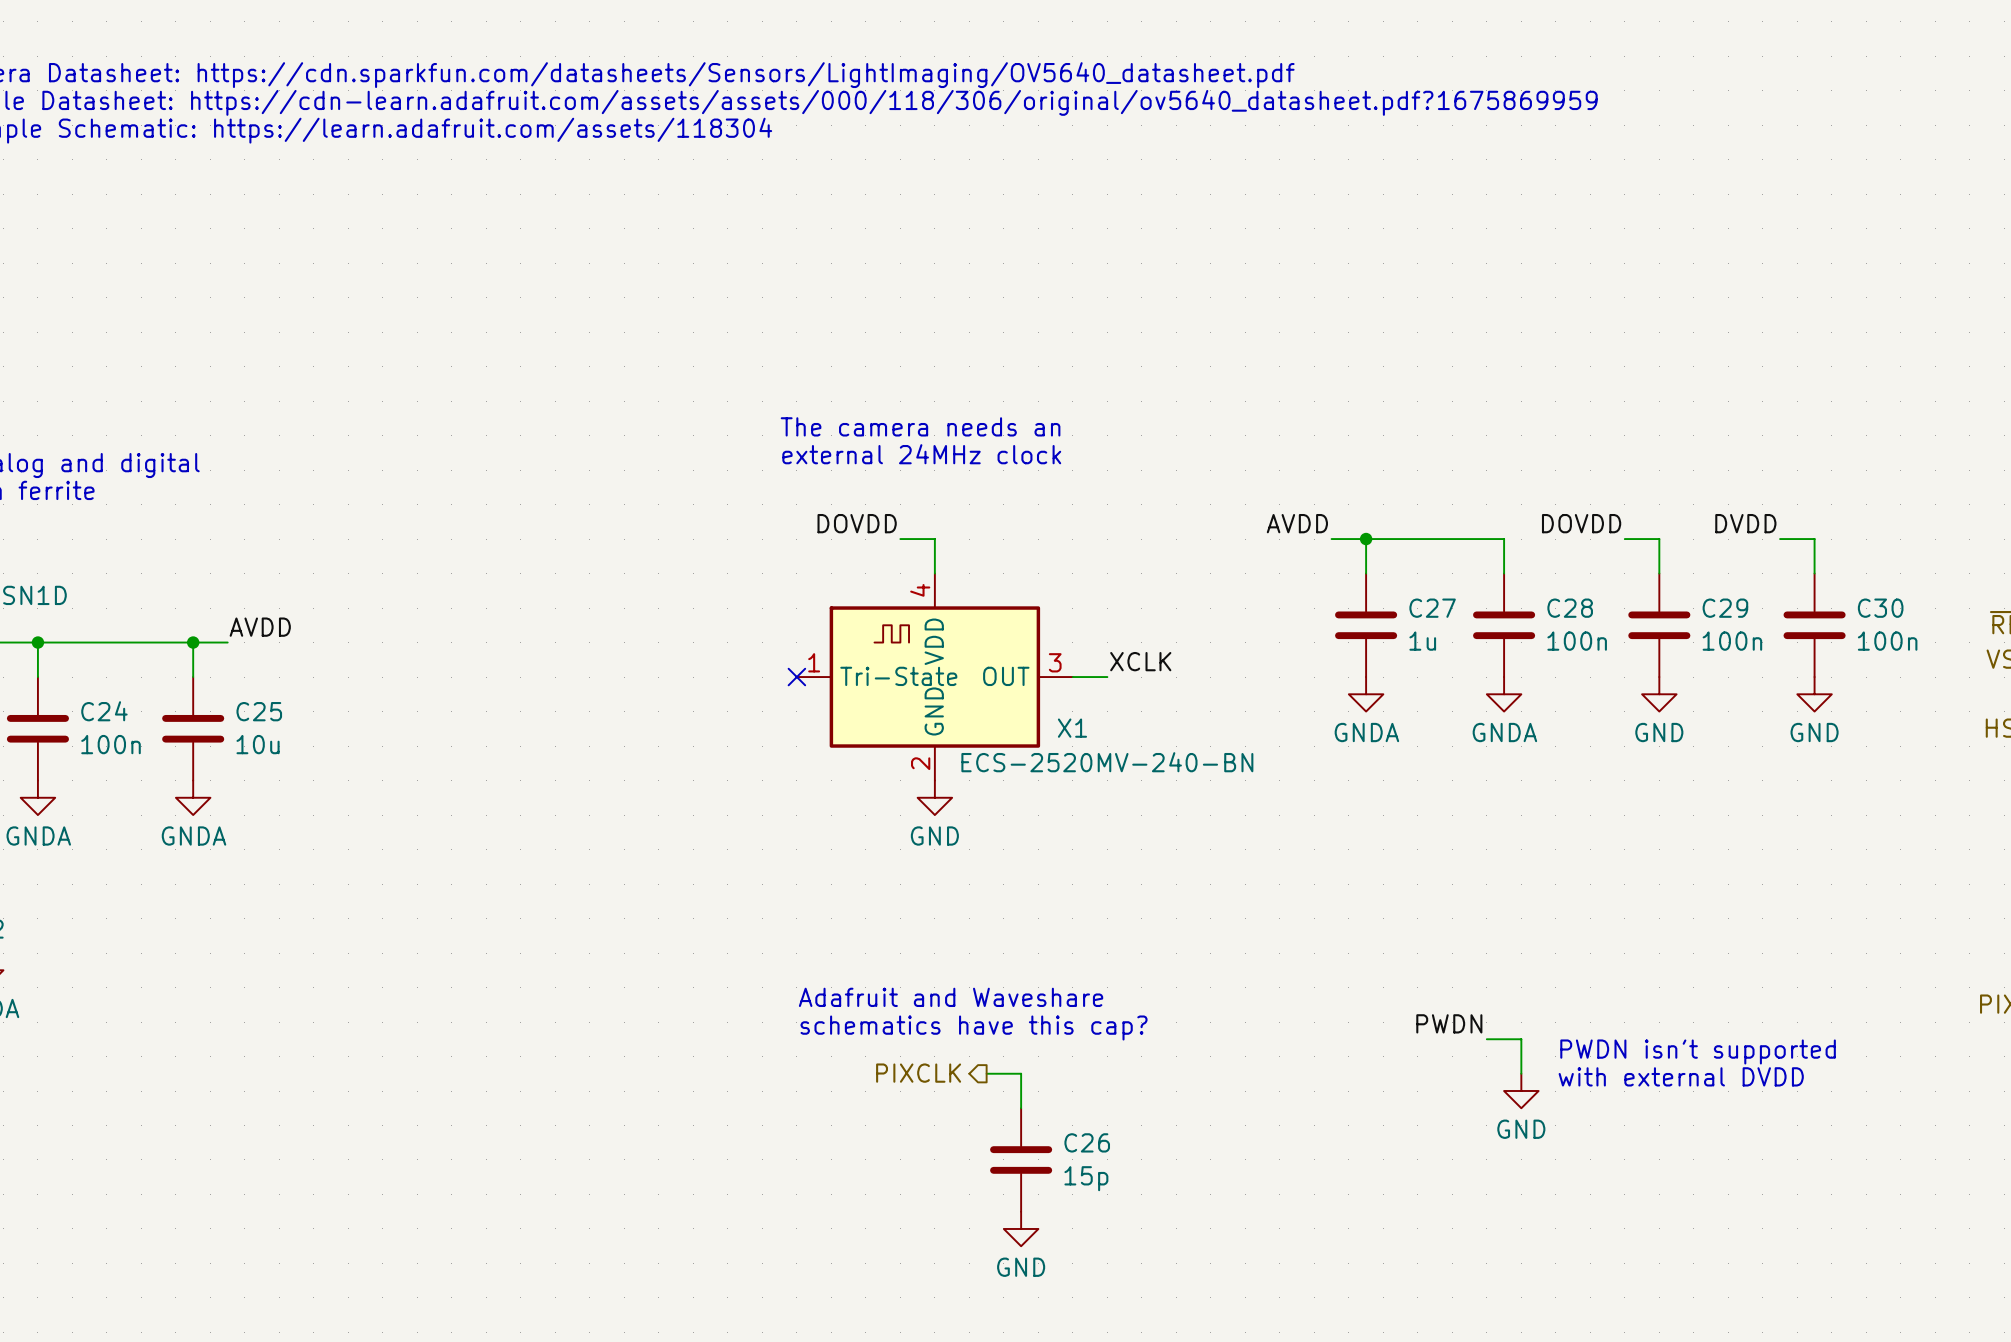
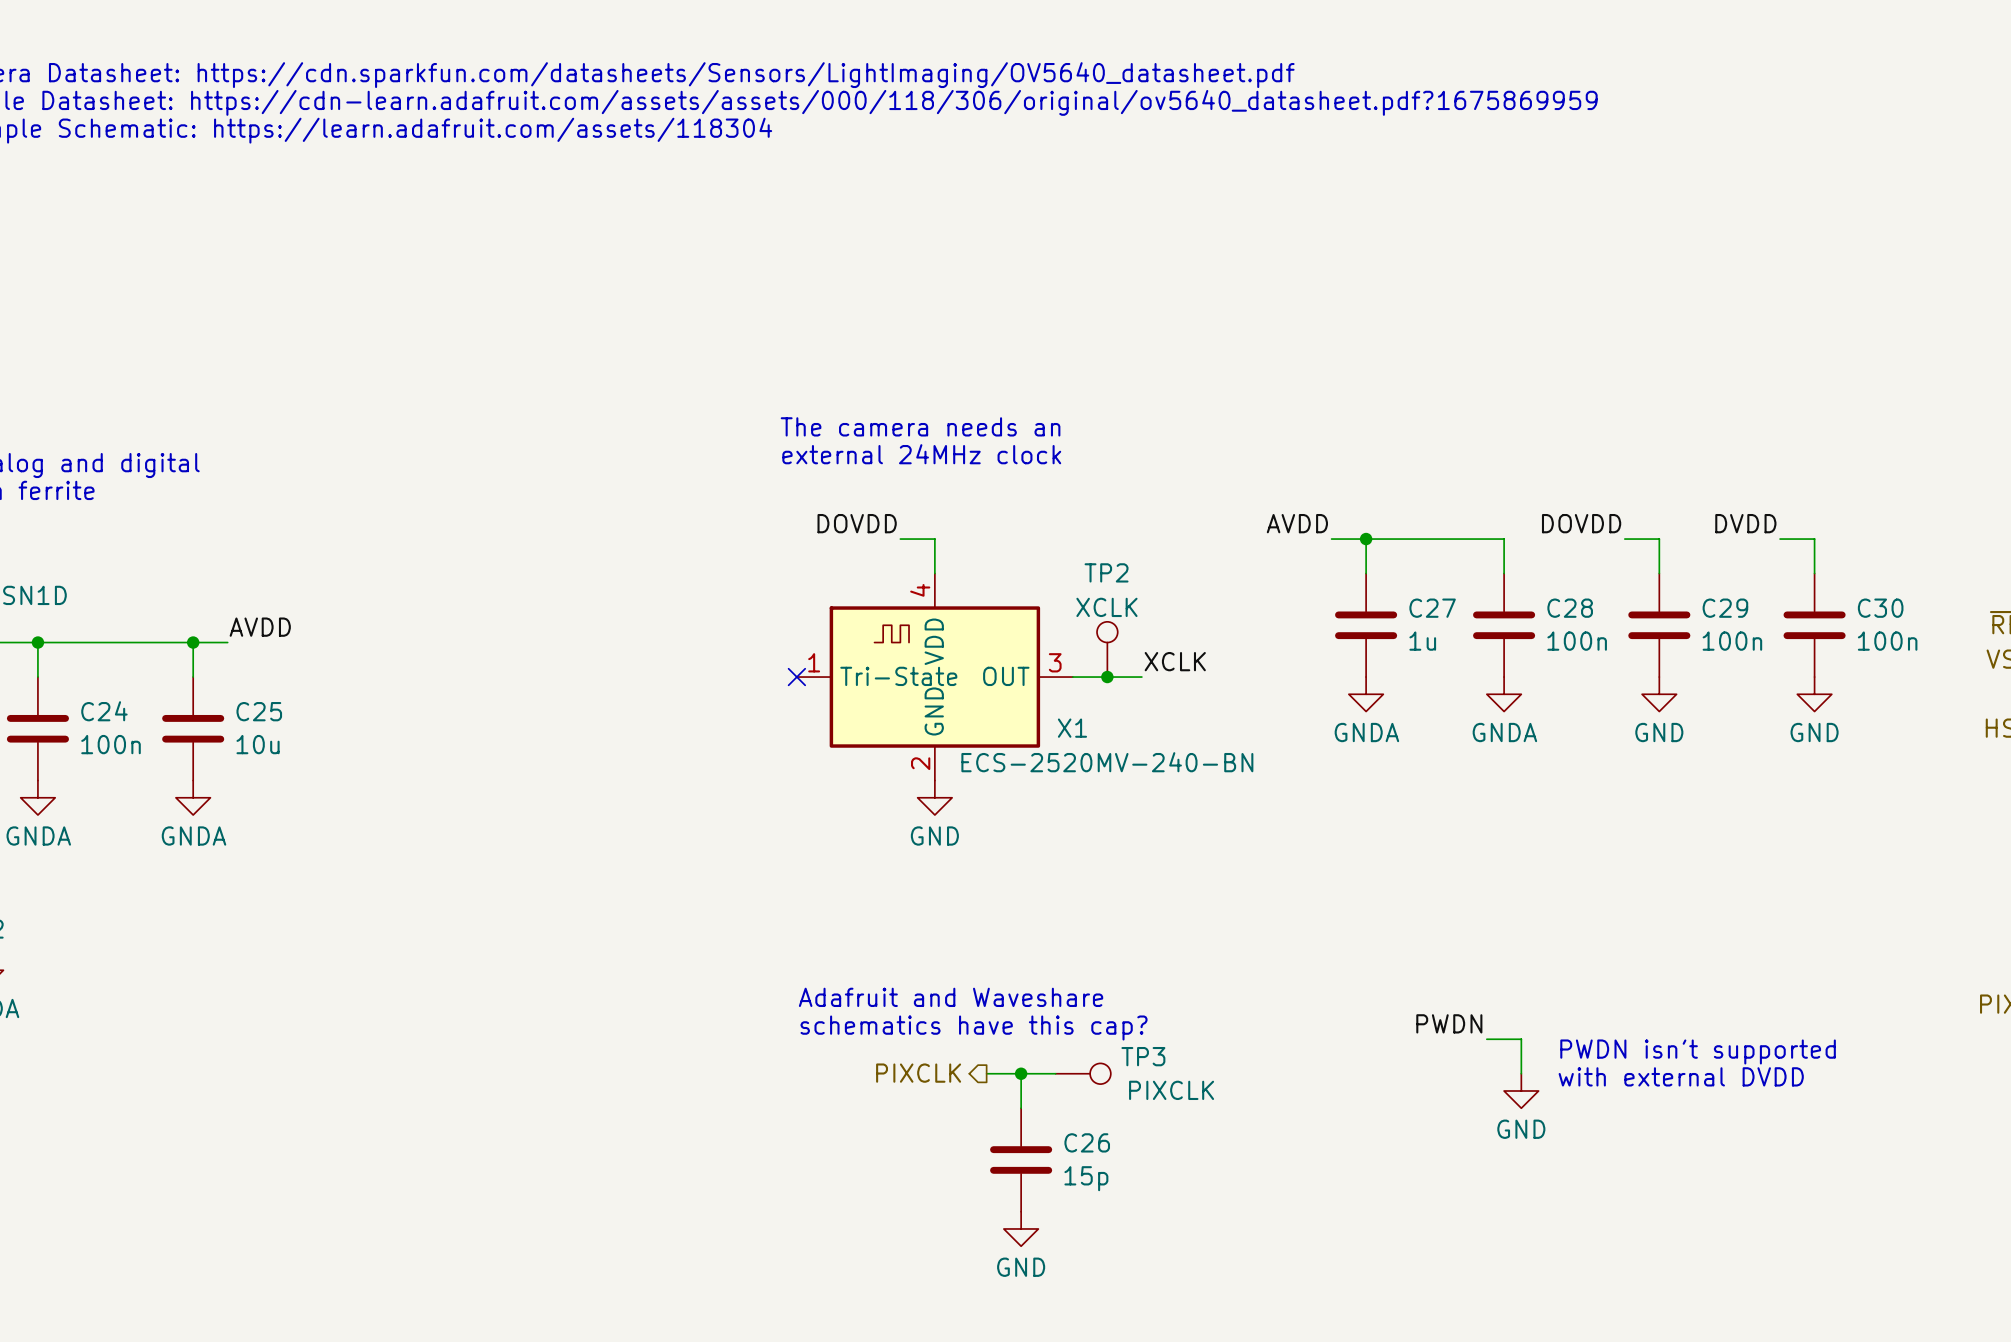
TP2: none -> XCLK (1107, 649)
label position: XCLK (1140, 661) -> XCLK (1175, 661)
wire: none -> (1107, 677) (1141, 677)
junction: none -> (1107, 677)
wire: none -> (1021, 1073) (1055, 1073)
junction: none -> (1021, 1073)
TP3: none -> PIXCLK (1083, 1073)

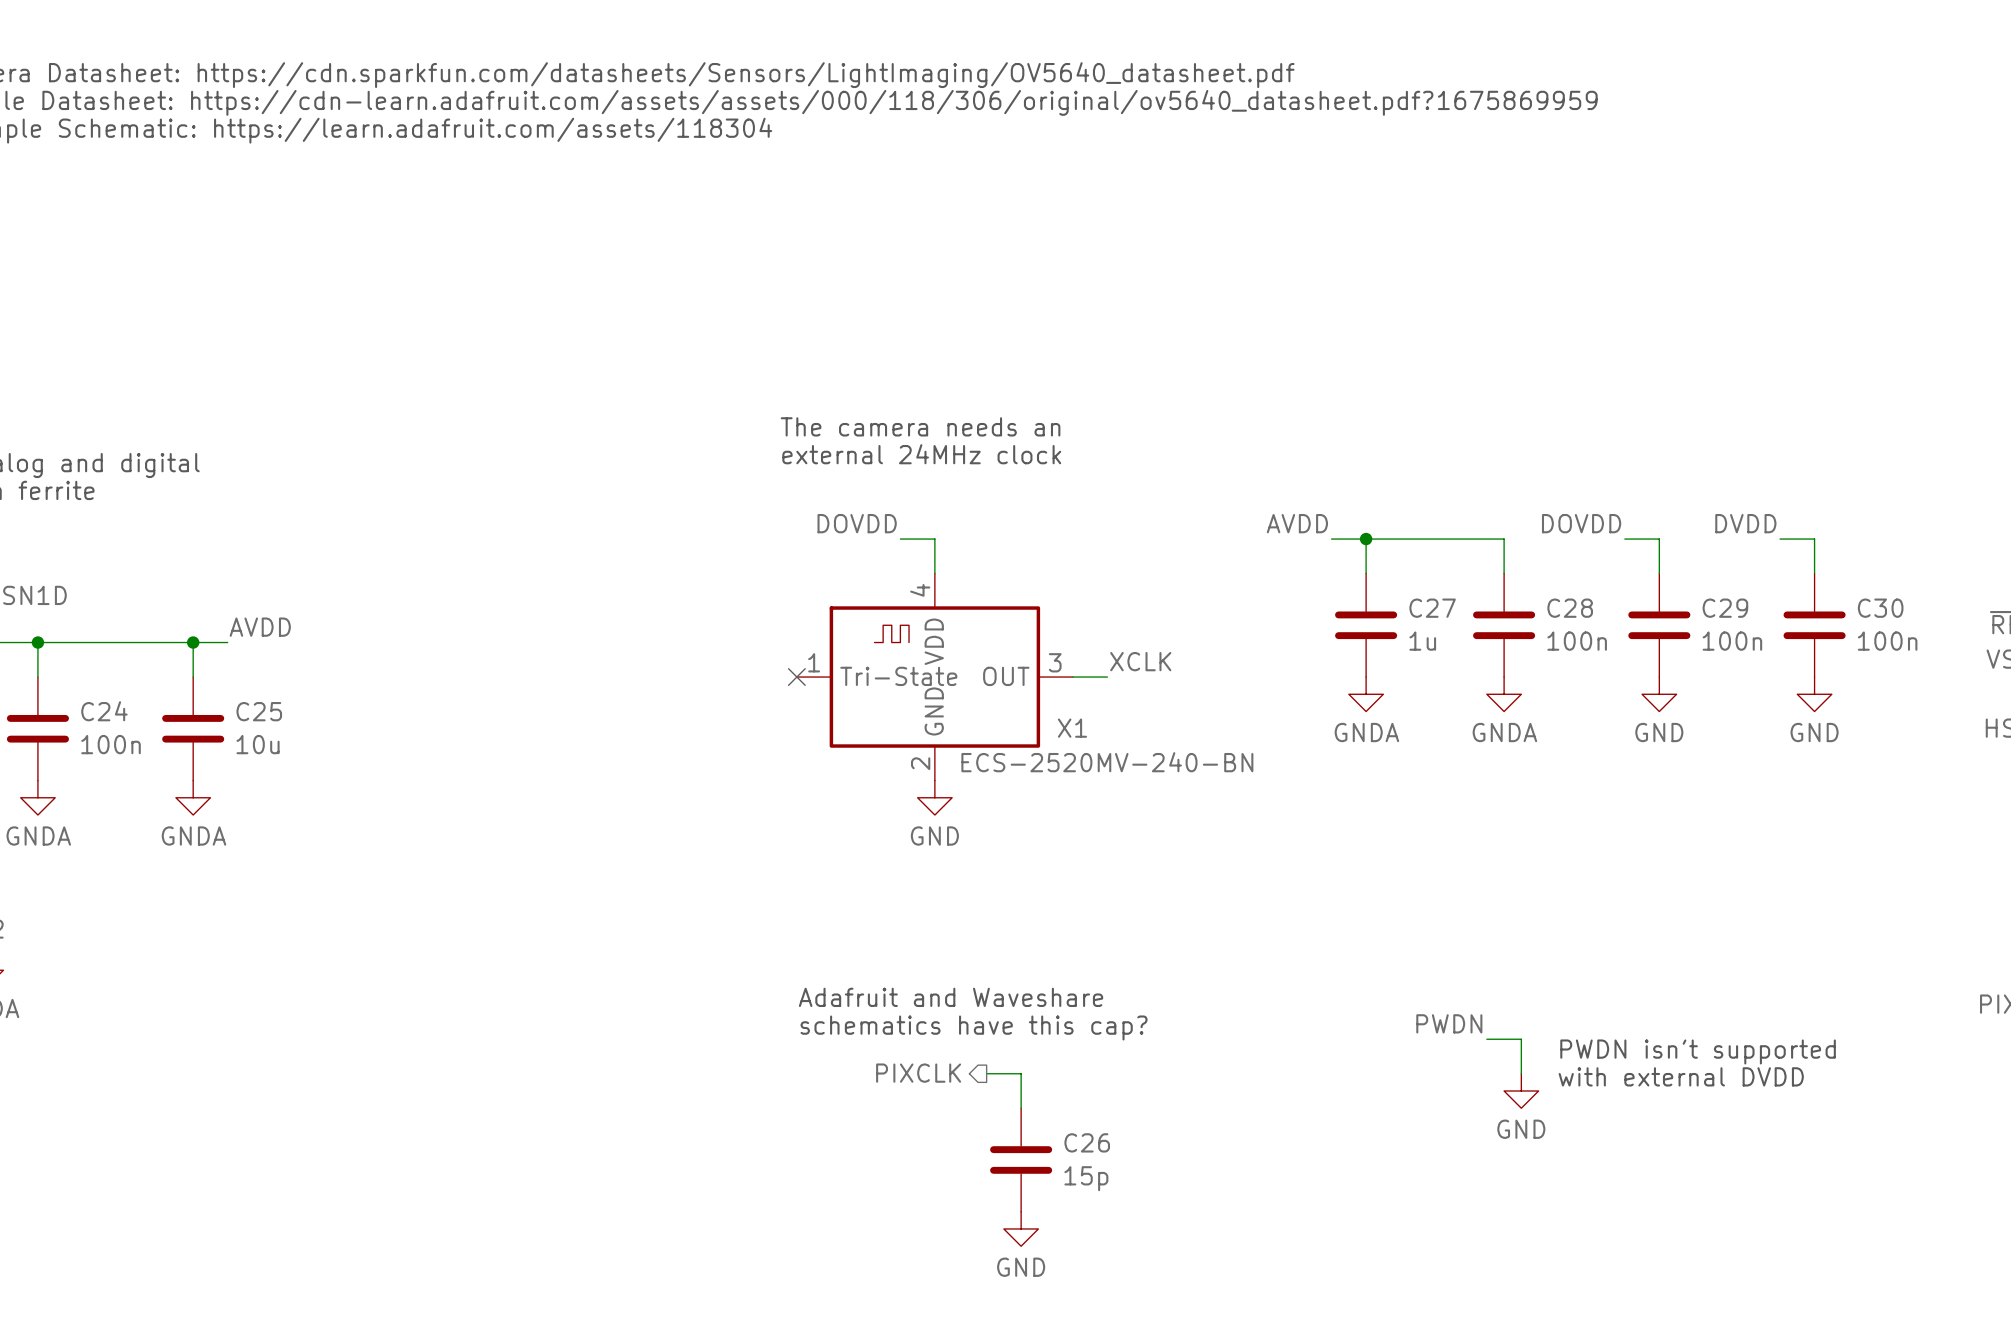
TP2: XCLK (1107, 649) -> none
label position: XCLK (1175, 661) -> XCLK (1140, 661)
wire: (1107, 677) (1141, 677) -> none
junction: (1107, 677) -> none
wire: (1021, 1073) (1055, 1073) -> none
junction: (1021, 1073) -> none
TP3: PIXCLK (1083, 1073) -> none

